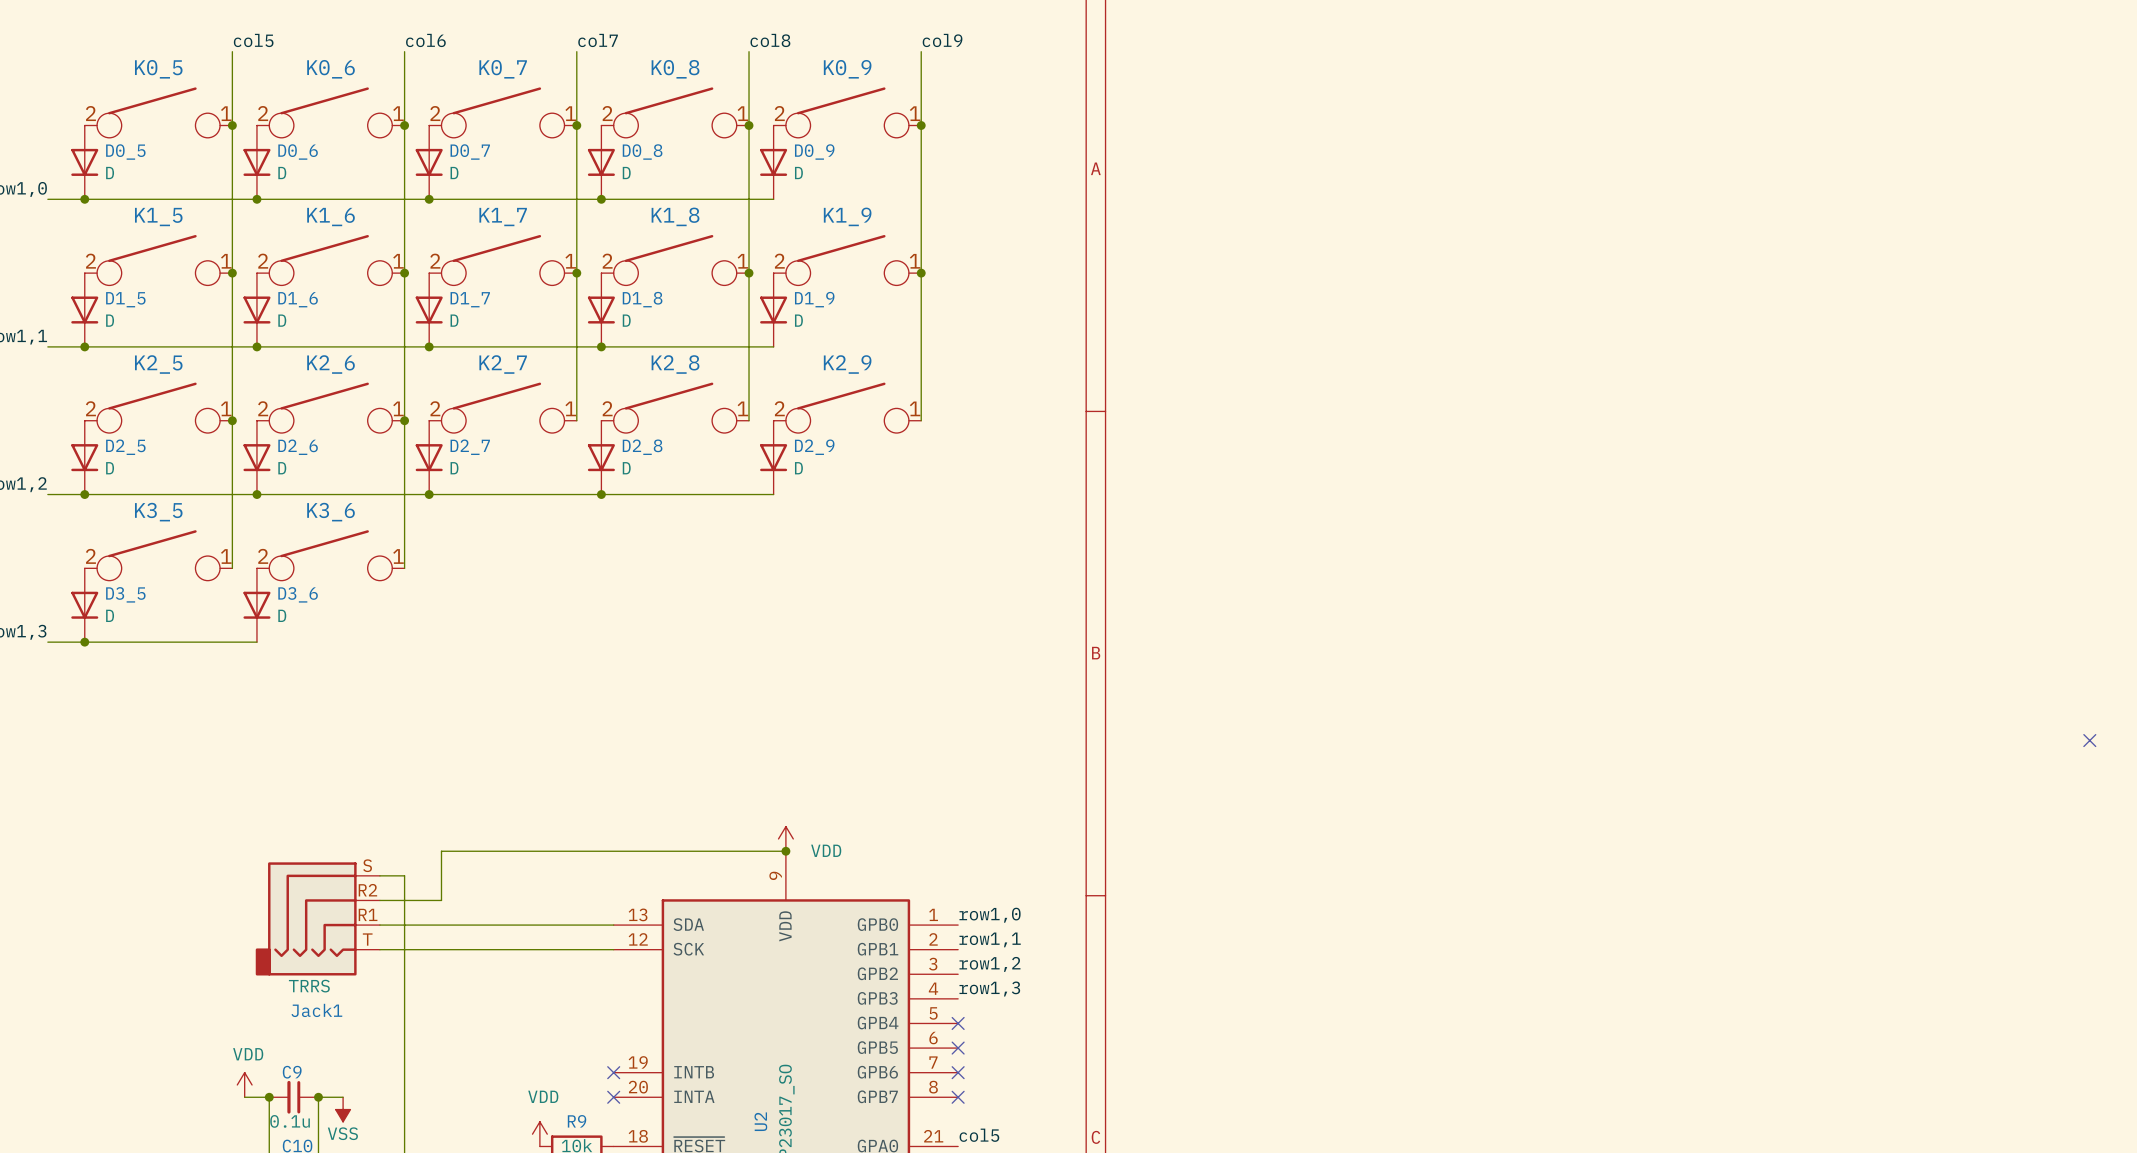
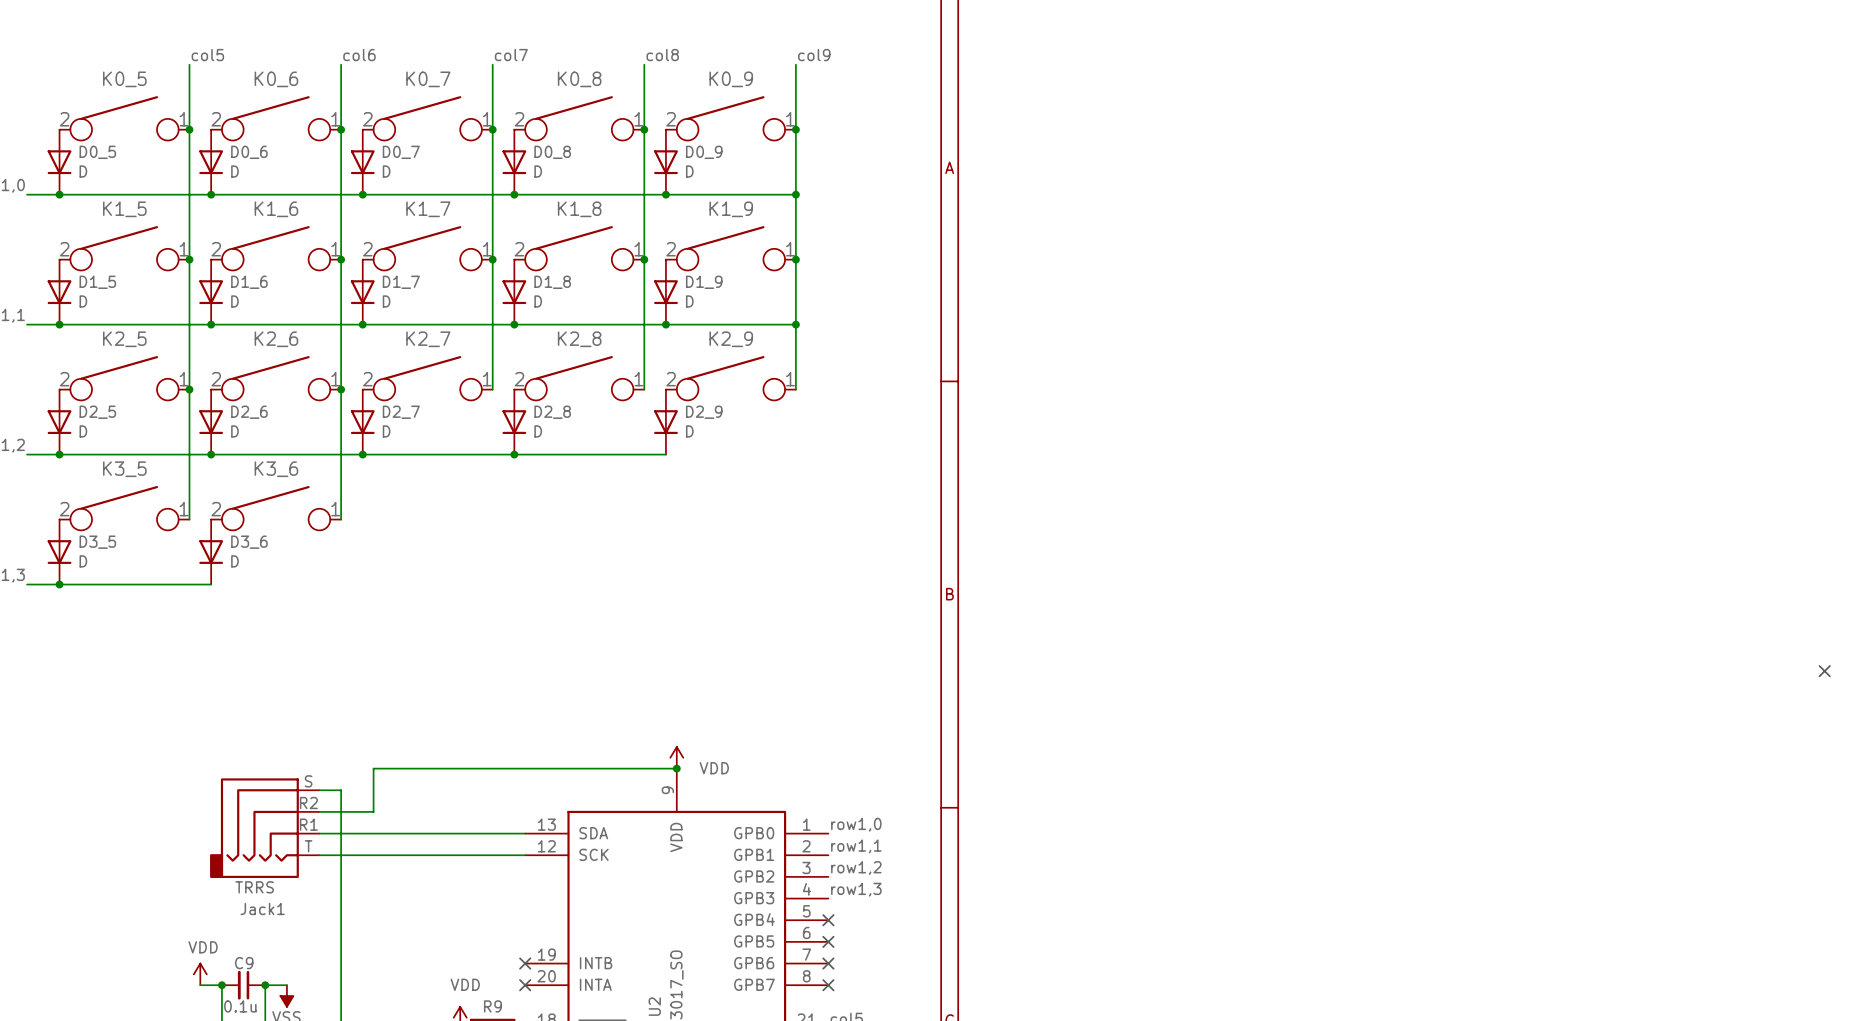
wire: none -> (665, 194) (795, 194)
junction: none -> (665, 194)
junction: none -> (795, 194)
wire: none -> (665, 324) (795, 324)
junction: none -> (665, 324)
junction: none -> (795, 324)

